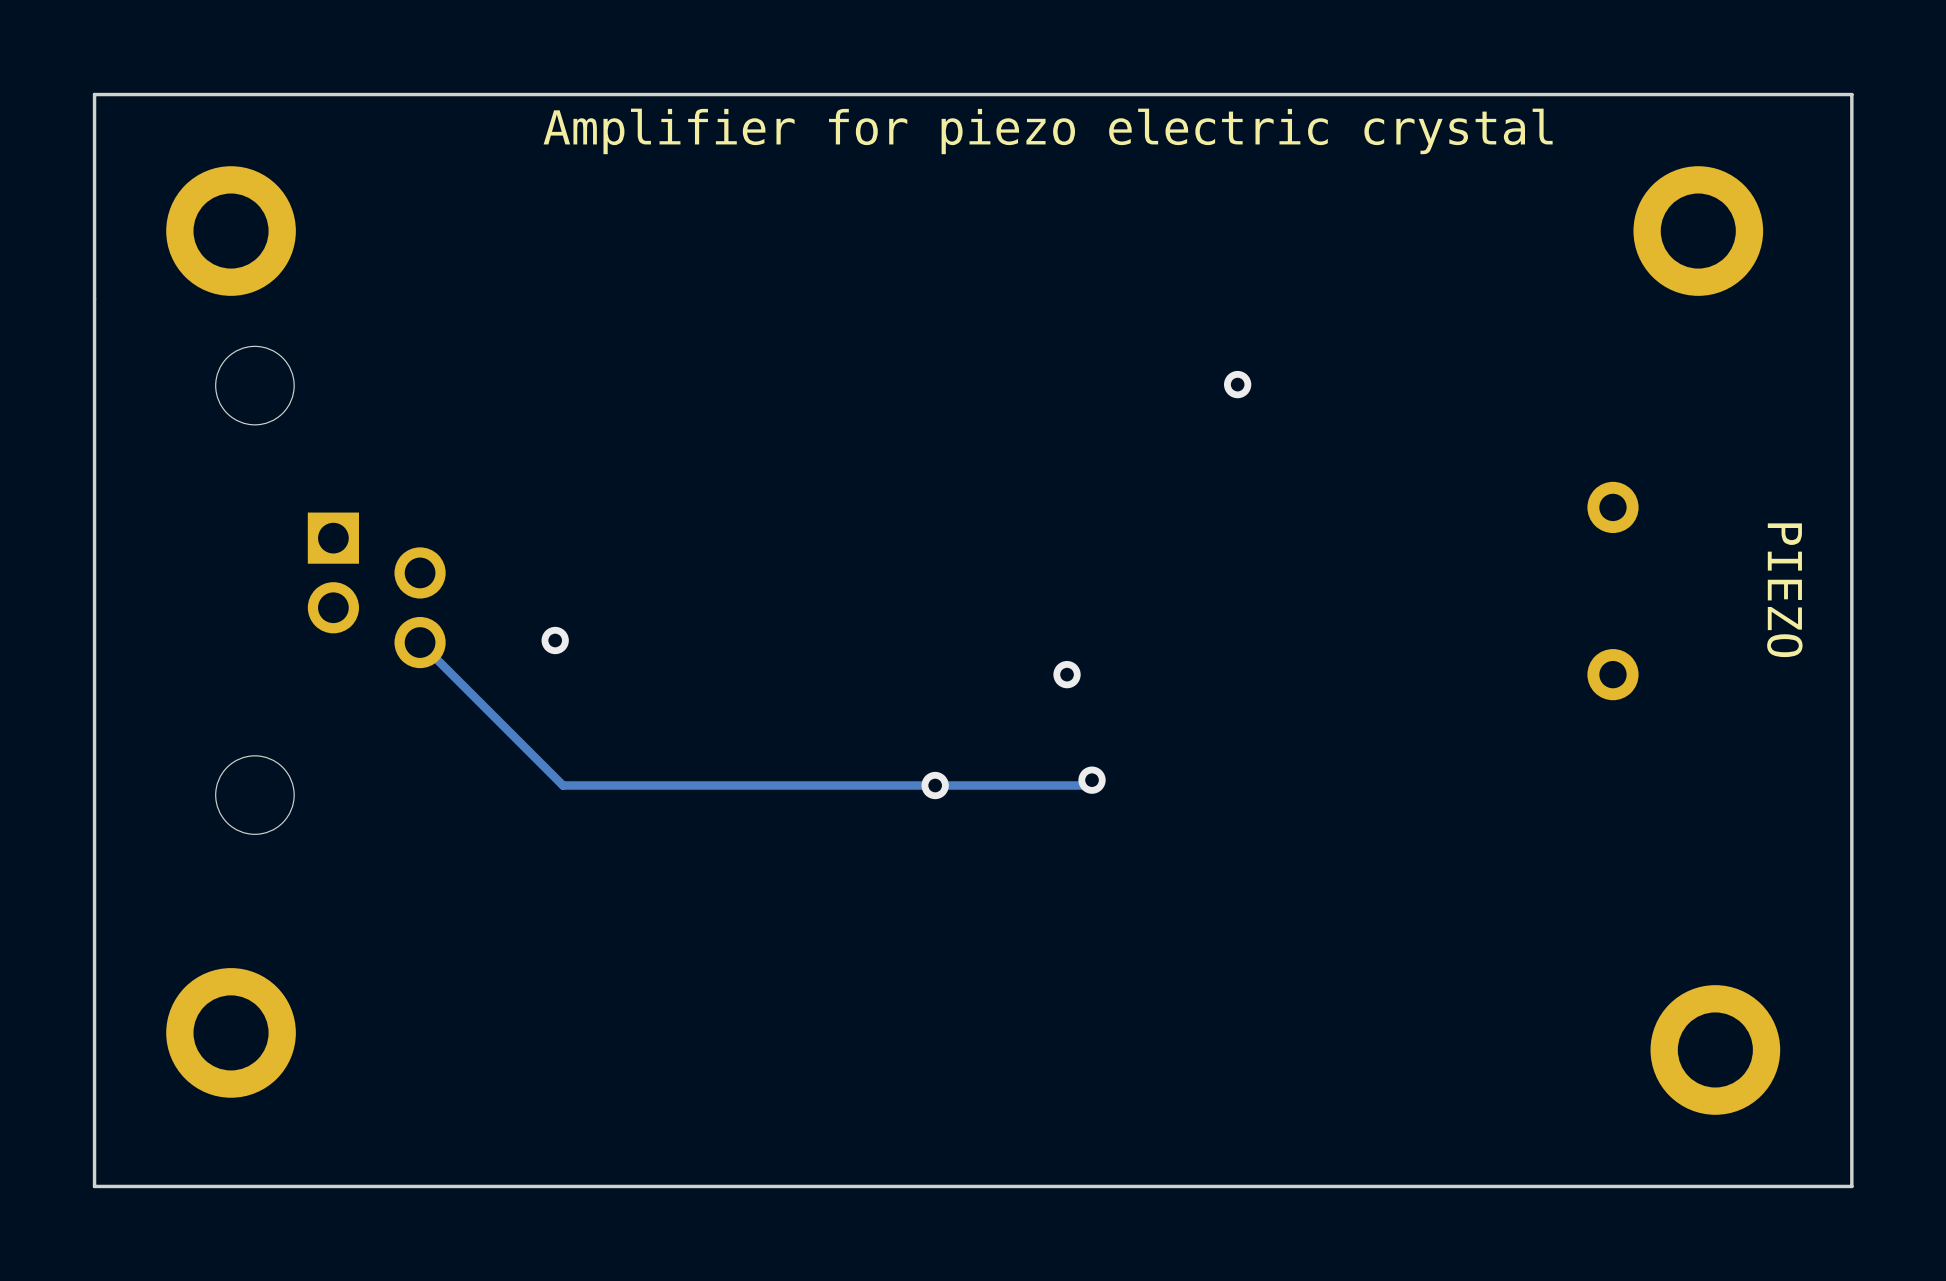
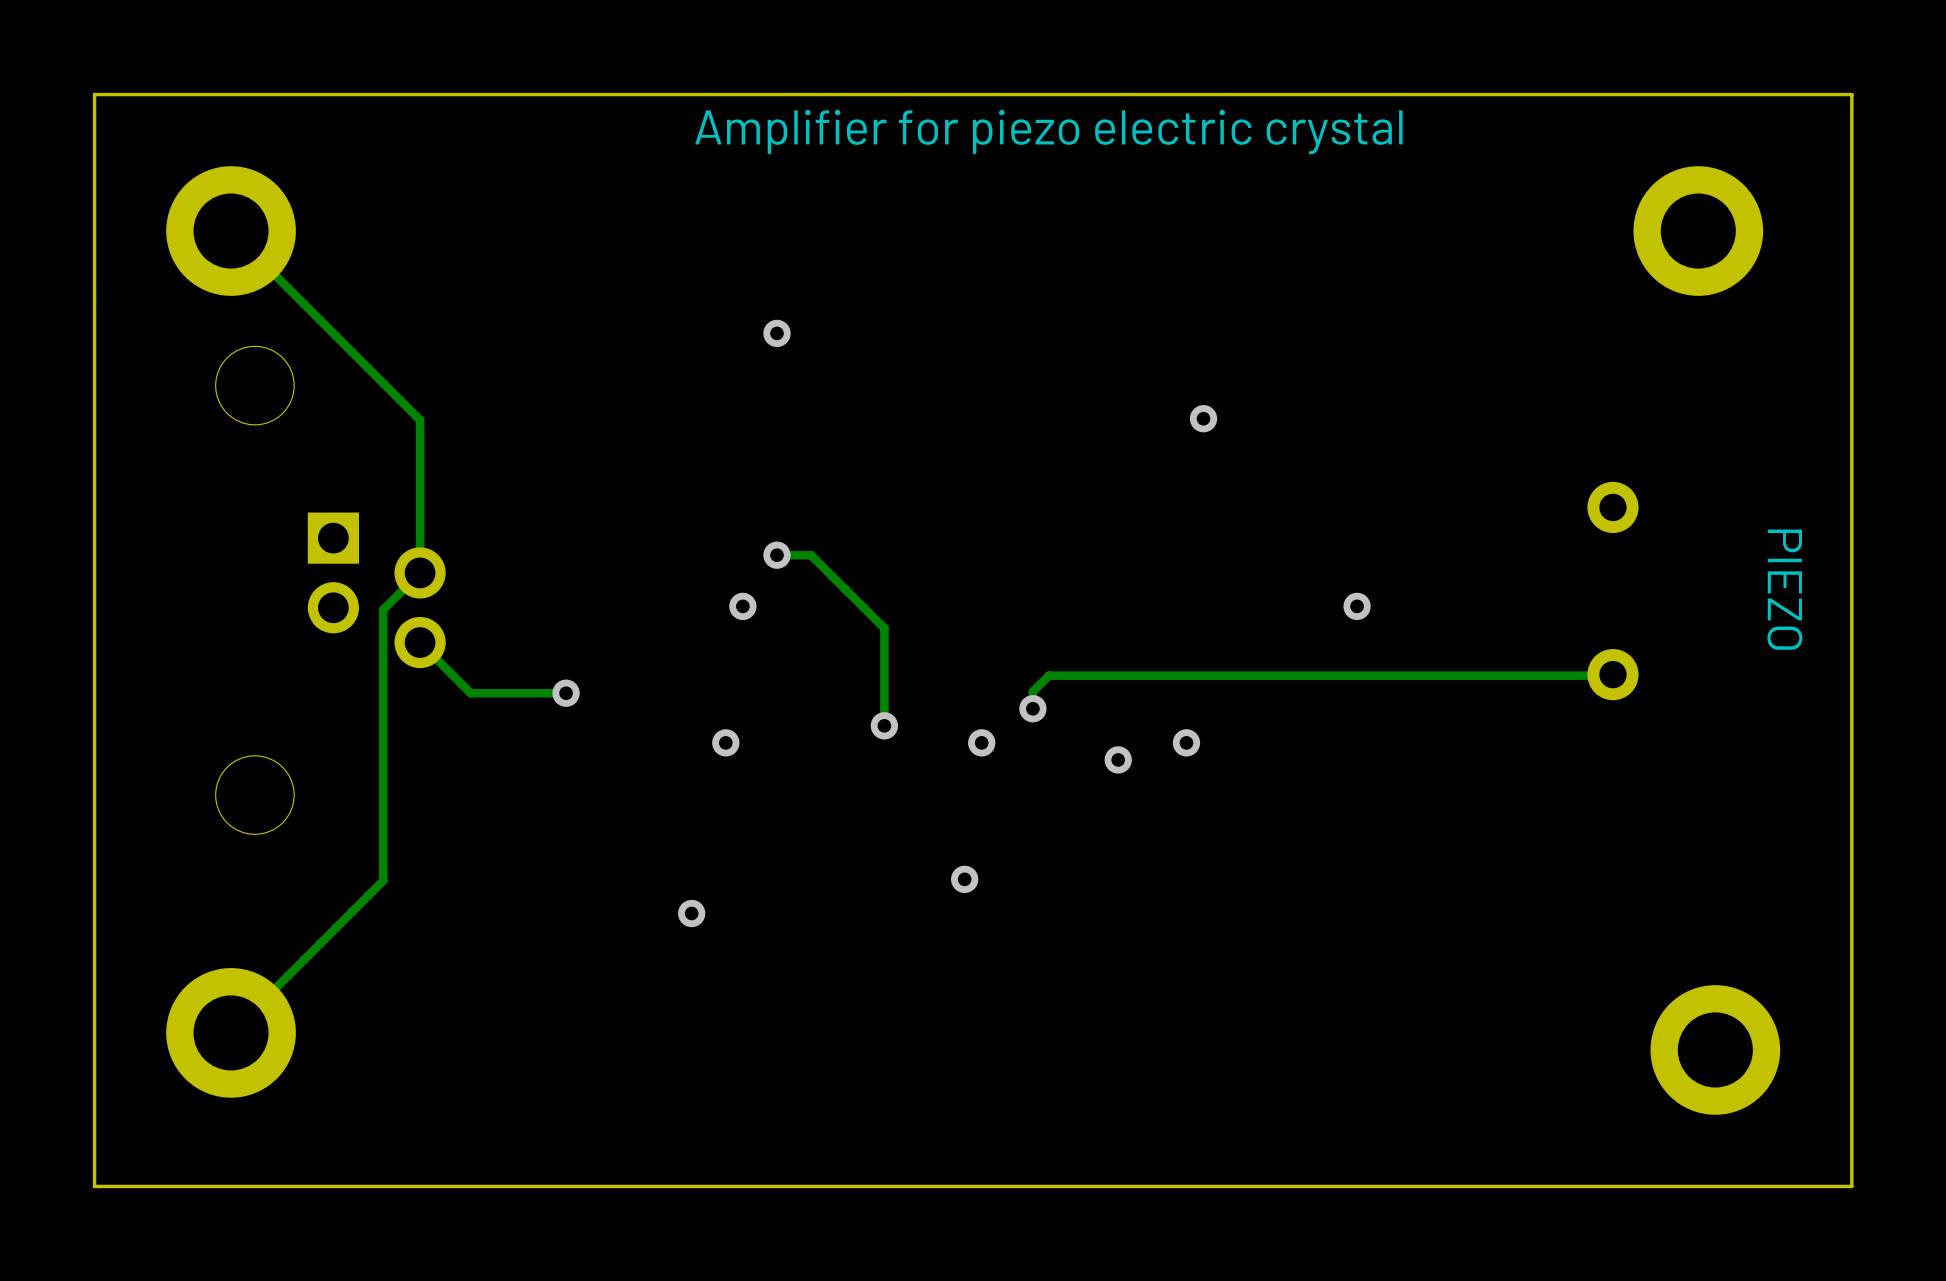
track: none -> (231, 231) (420, 420) (420, 572) (383, 609) (383, 880) (231, 1032)
via: none -> (776, 333)
via position: (1237, 384) -> (1203, 418)
track: none -> (776, 555) (811, 555) (884, 628) (884, 725)
via: none -> (776, 555)
via: none -> (742, 606)
via: none -> (1357, 606)
via position: (555, 640) -> (566, 693)
via: (1067, 674) -> none
track: none -> (1612, 674) (1048, 675) (1032, 691) (1032, 708)
track: (470, 693) (563, 785) (1086, 785) (1092, 780) -> (470, 693) (566, 693)
via: none -> (1032, 708)
via: none -> (884, 725)
via: none -> (725, 742)
via: none -> (981, 742)
via: none -> (1186, 742)
via position: (1092, 780) -> (1118, 759)
via: (935, 785) -> none
via: none -> (964, 879)
via: none -> (691, 913)

